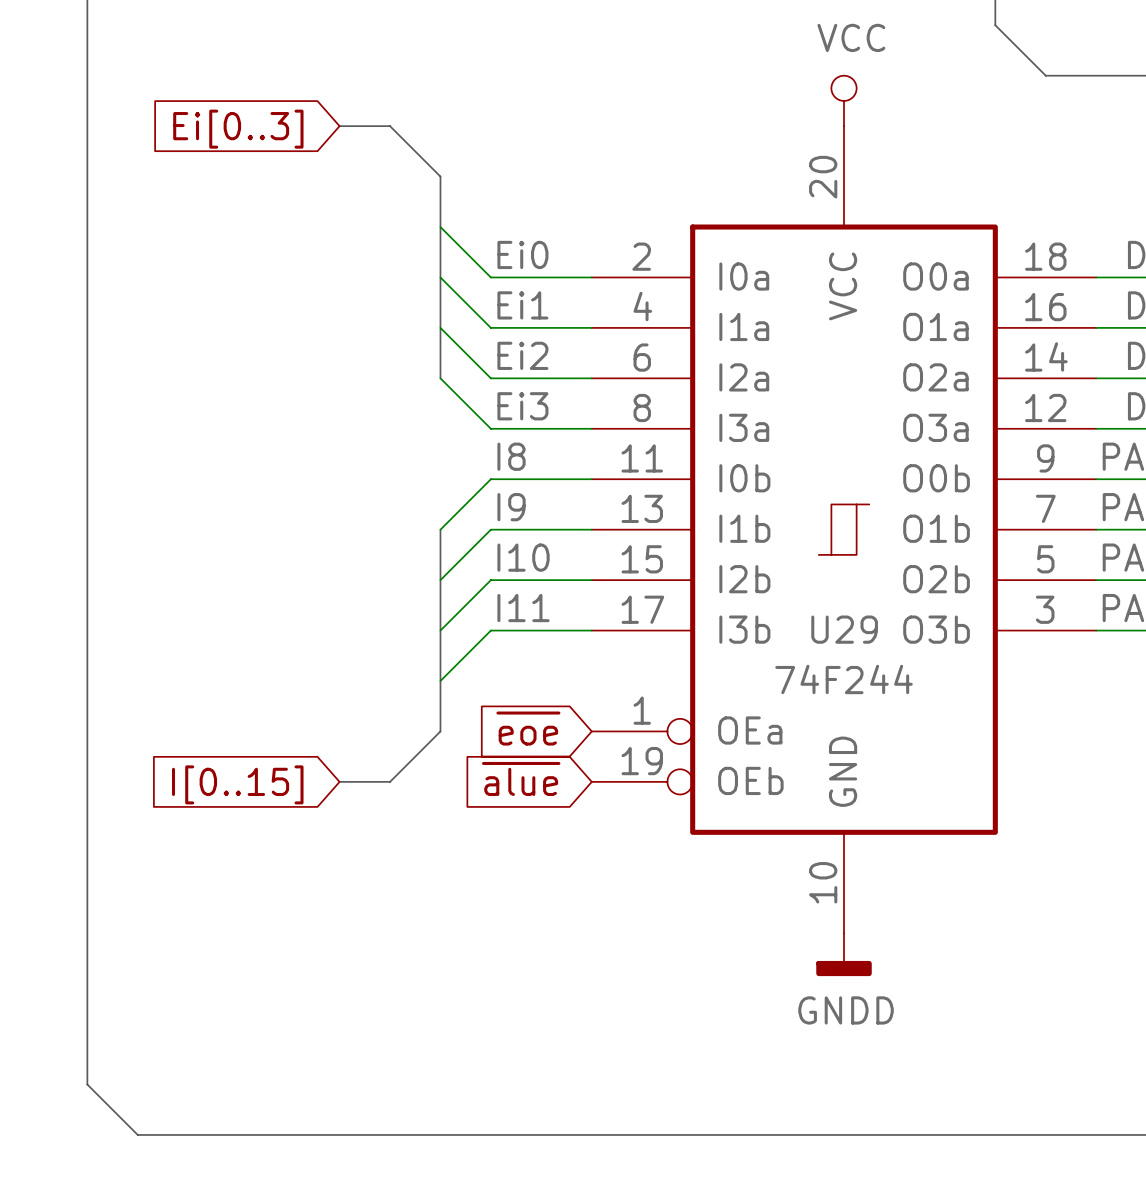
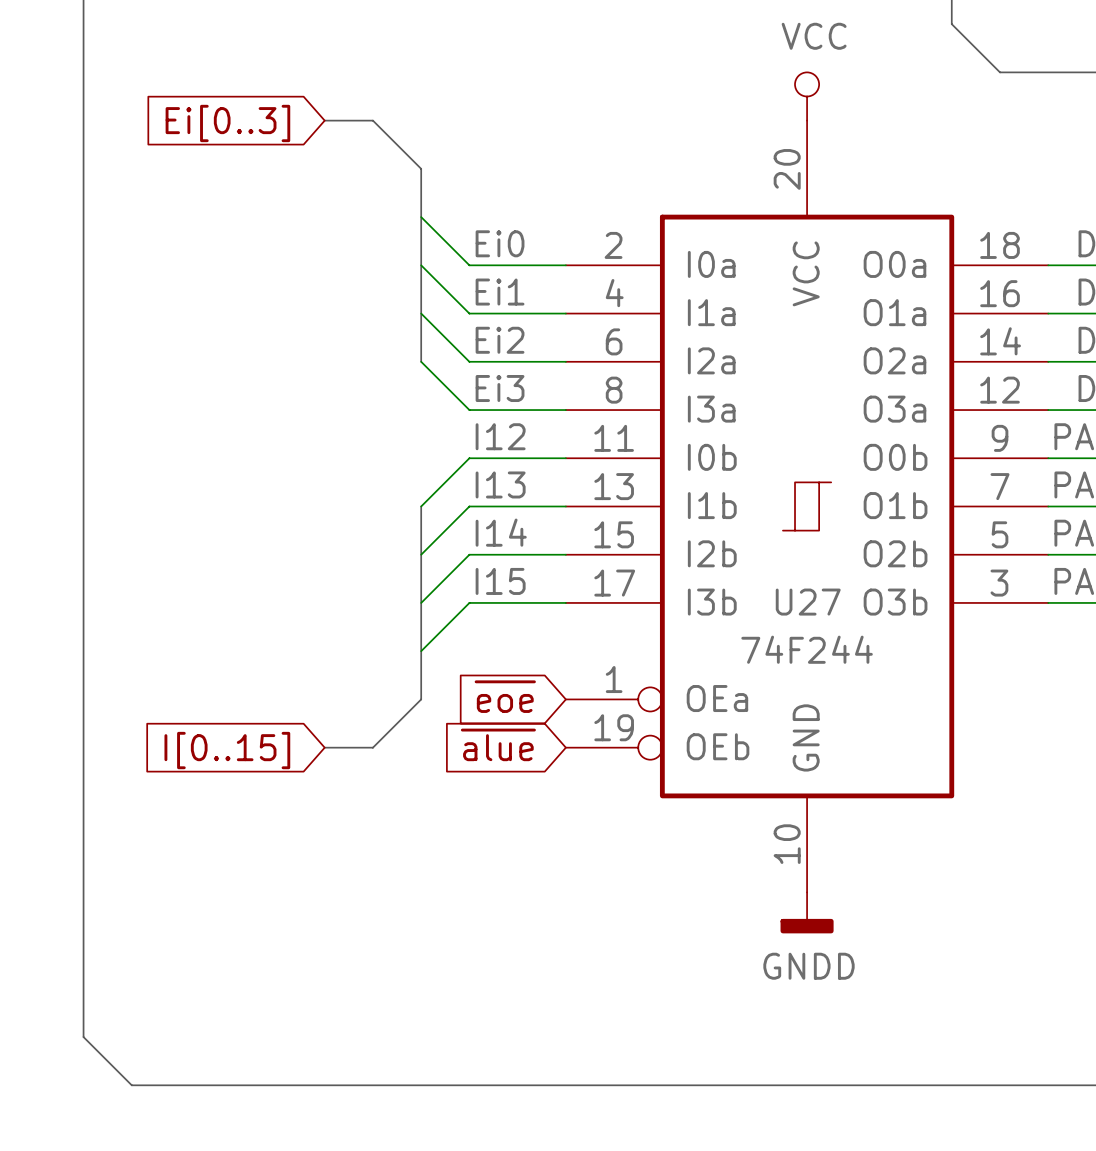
label: I8 (511, 456) -> I12 (500, 436)
label: I9 (511, 507) -> I13 (500, 484)
label: I10 (523, 557) -> I14 (501, 532)
label: I11 (523, 608) -> I15 (500, 581)
U29 name: U29 (844, 629) -> U27 (808, 602)

